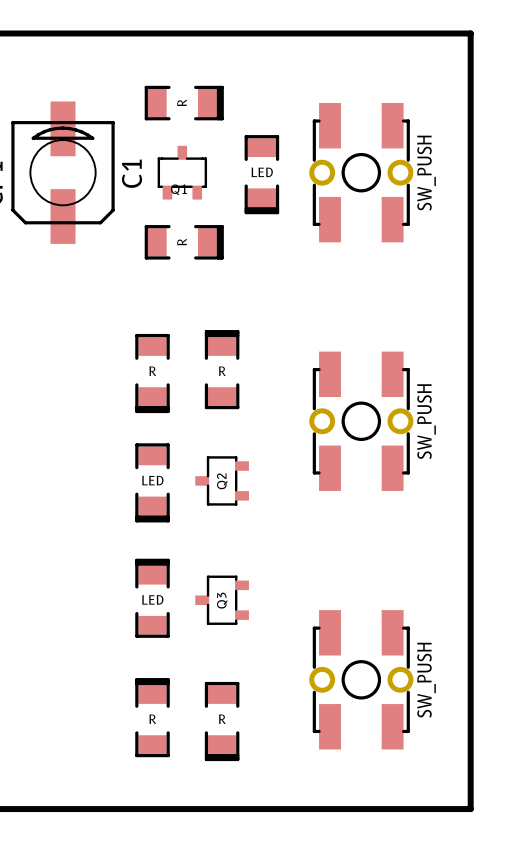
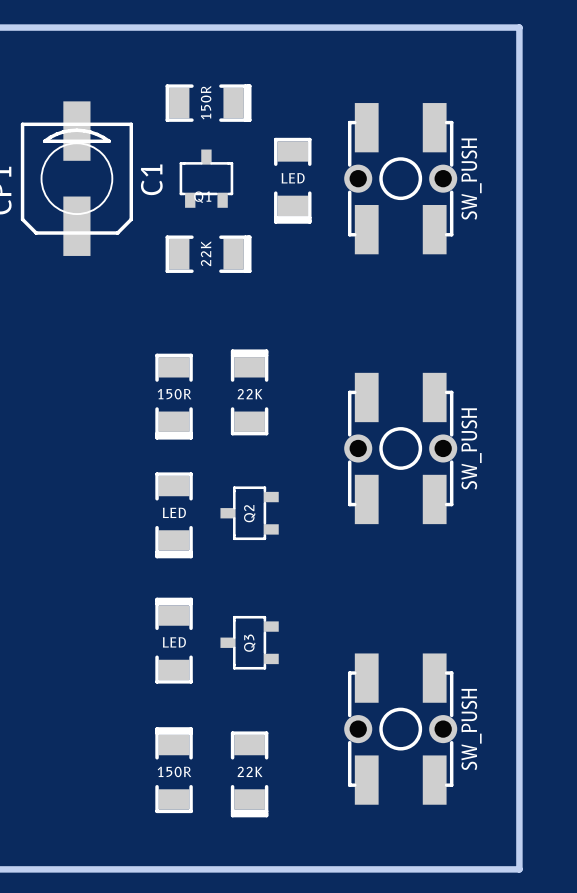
part value: R (182, 102) -> 150R (206, 102)
part value: R (182, 242) -> 22K (206, 253)
part value: R (152, 371) -> 150R (174, 394)
part value: R (222, 371) -> 22K (250, 394)
part value: R (152, 719) -> 150R (174, 771)
part value: R (222, 719) -> 22K (250, 771)

